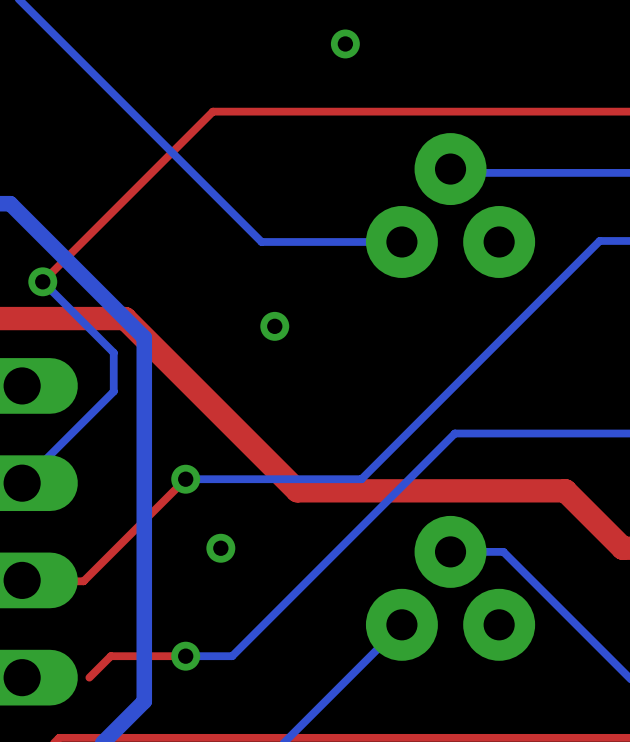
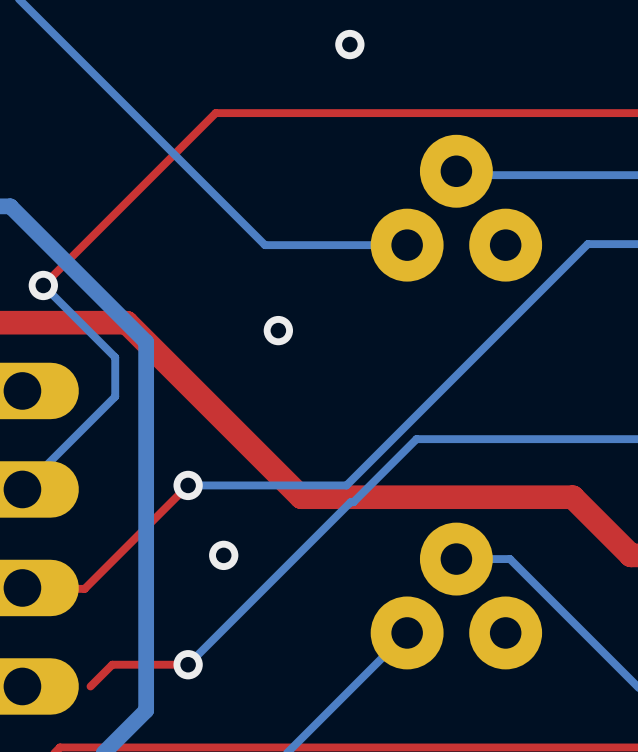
bottom track: (599, 240) (361, 479) (342, 479) -> (607, 244) (587, 244) (346, 485)
bottom track: (454, 433) (232, 656) (185, 656) -> (460, 439) (416, 439) (188, 664)

